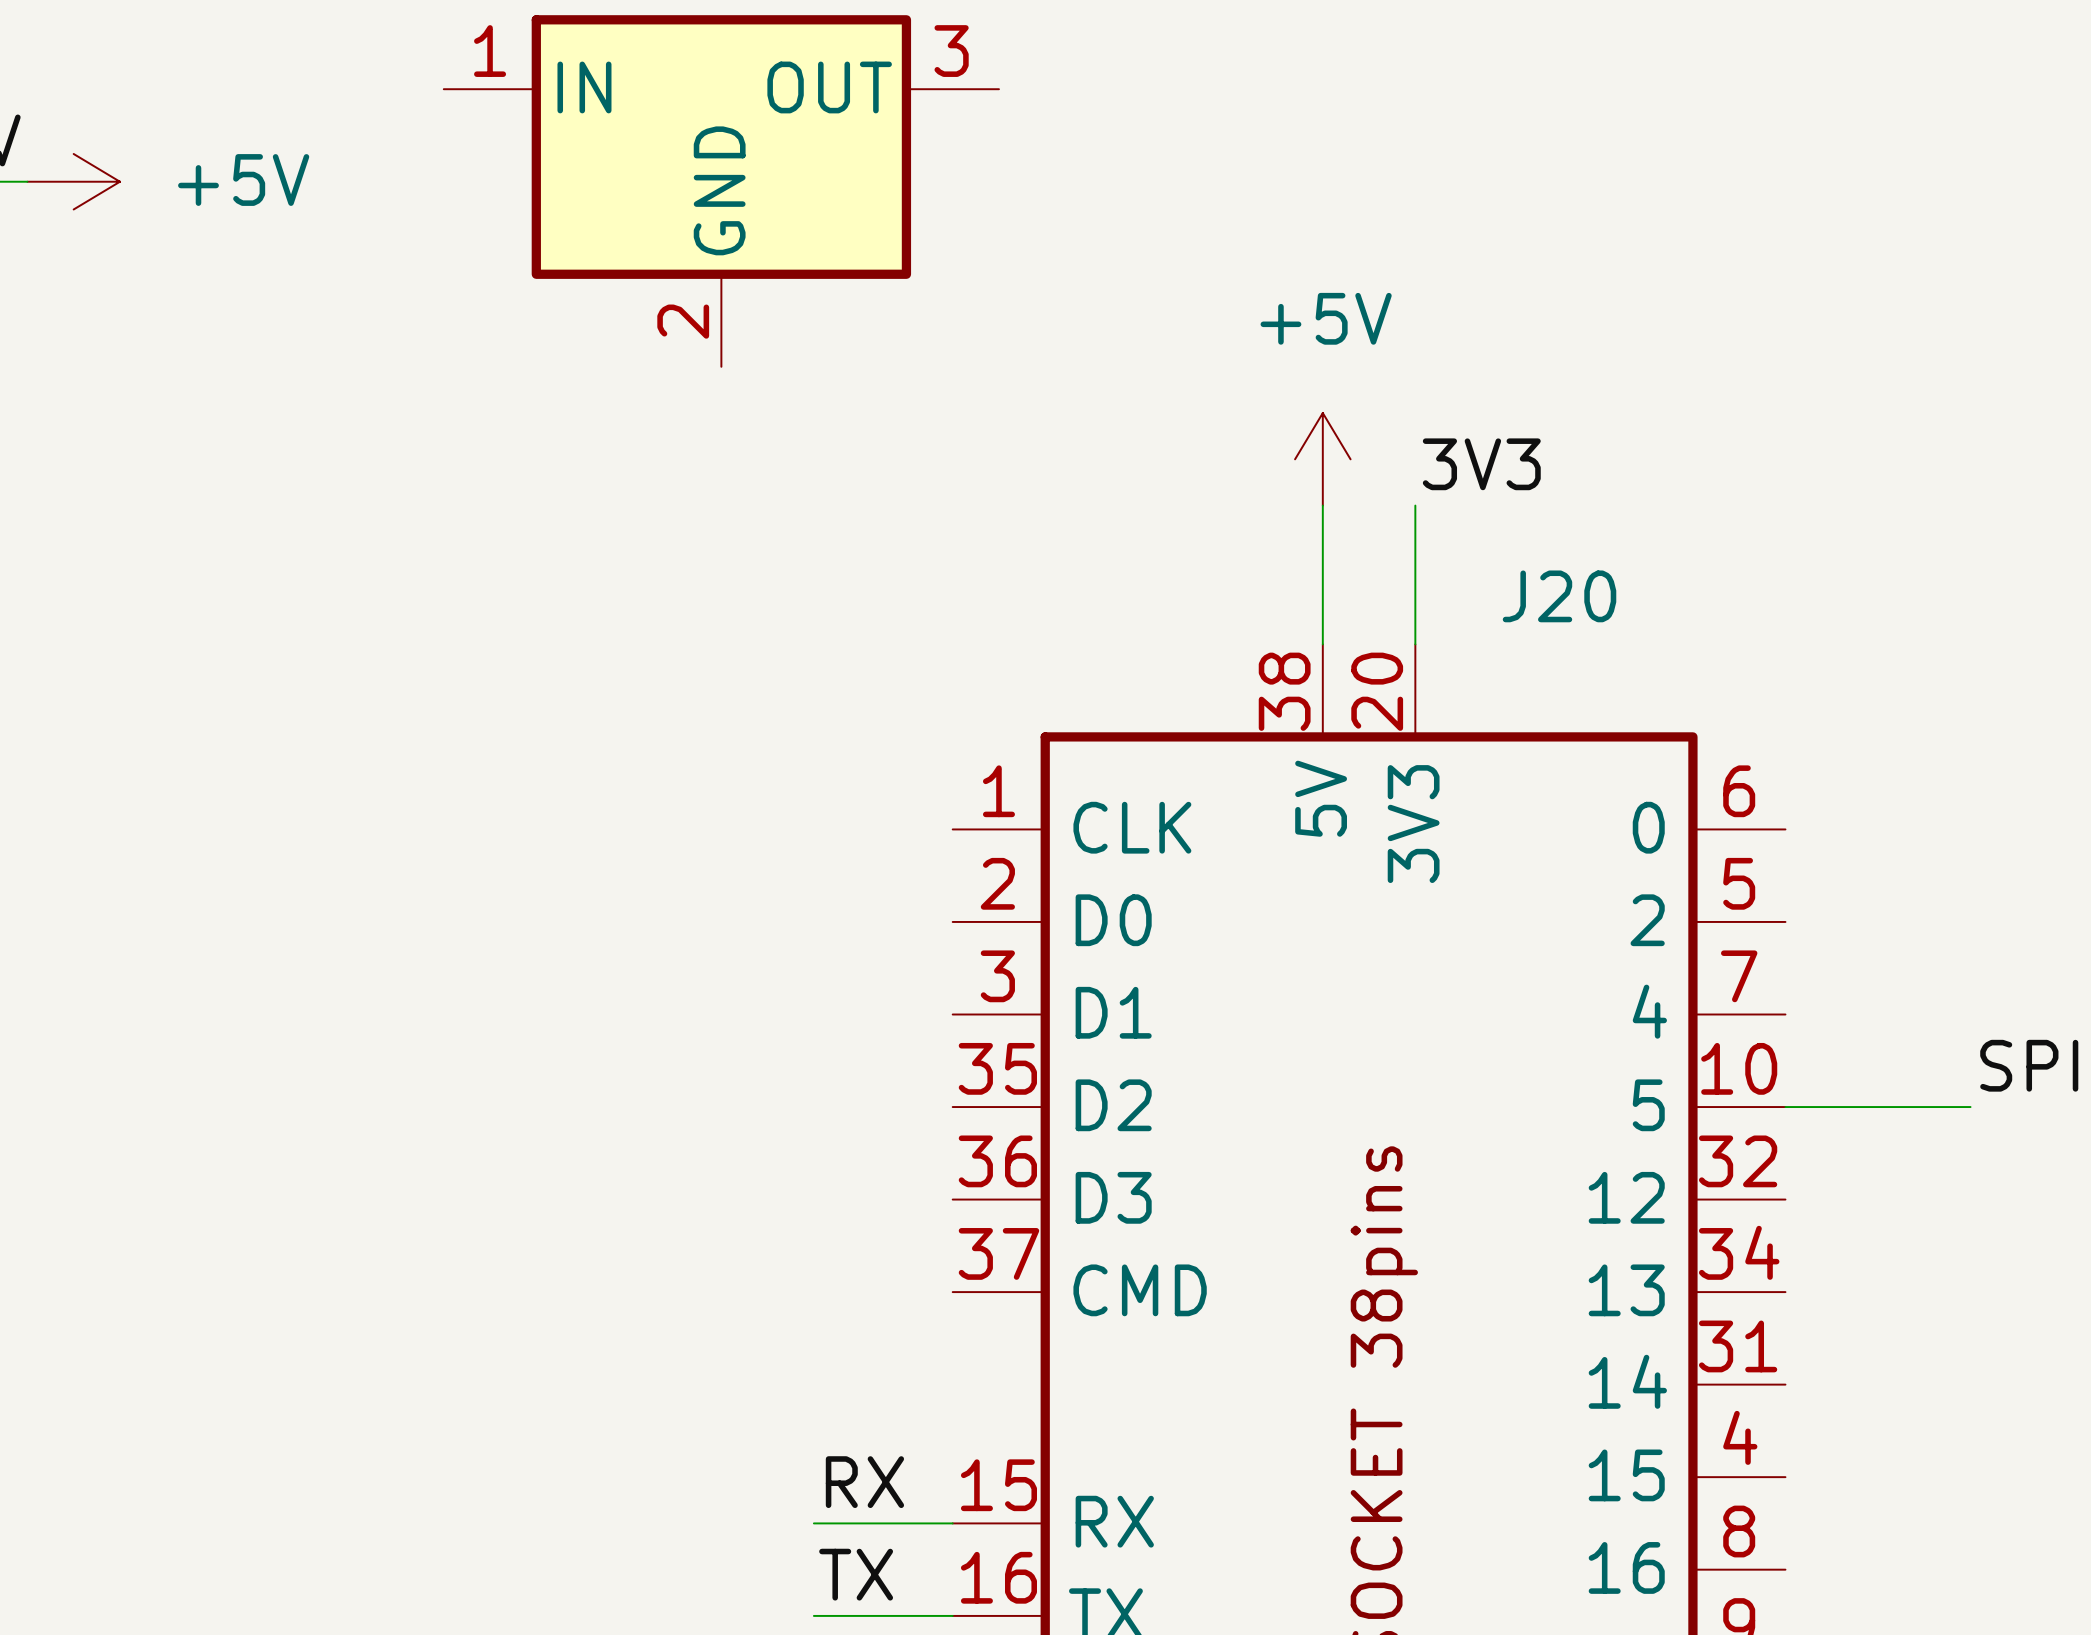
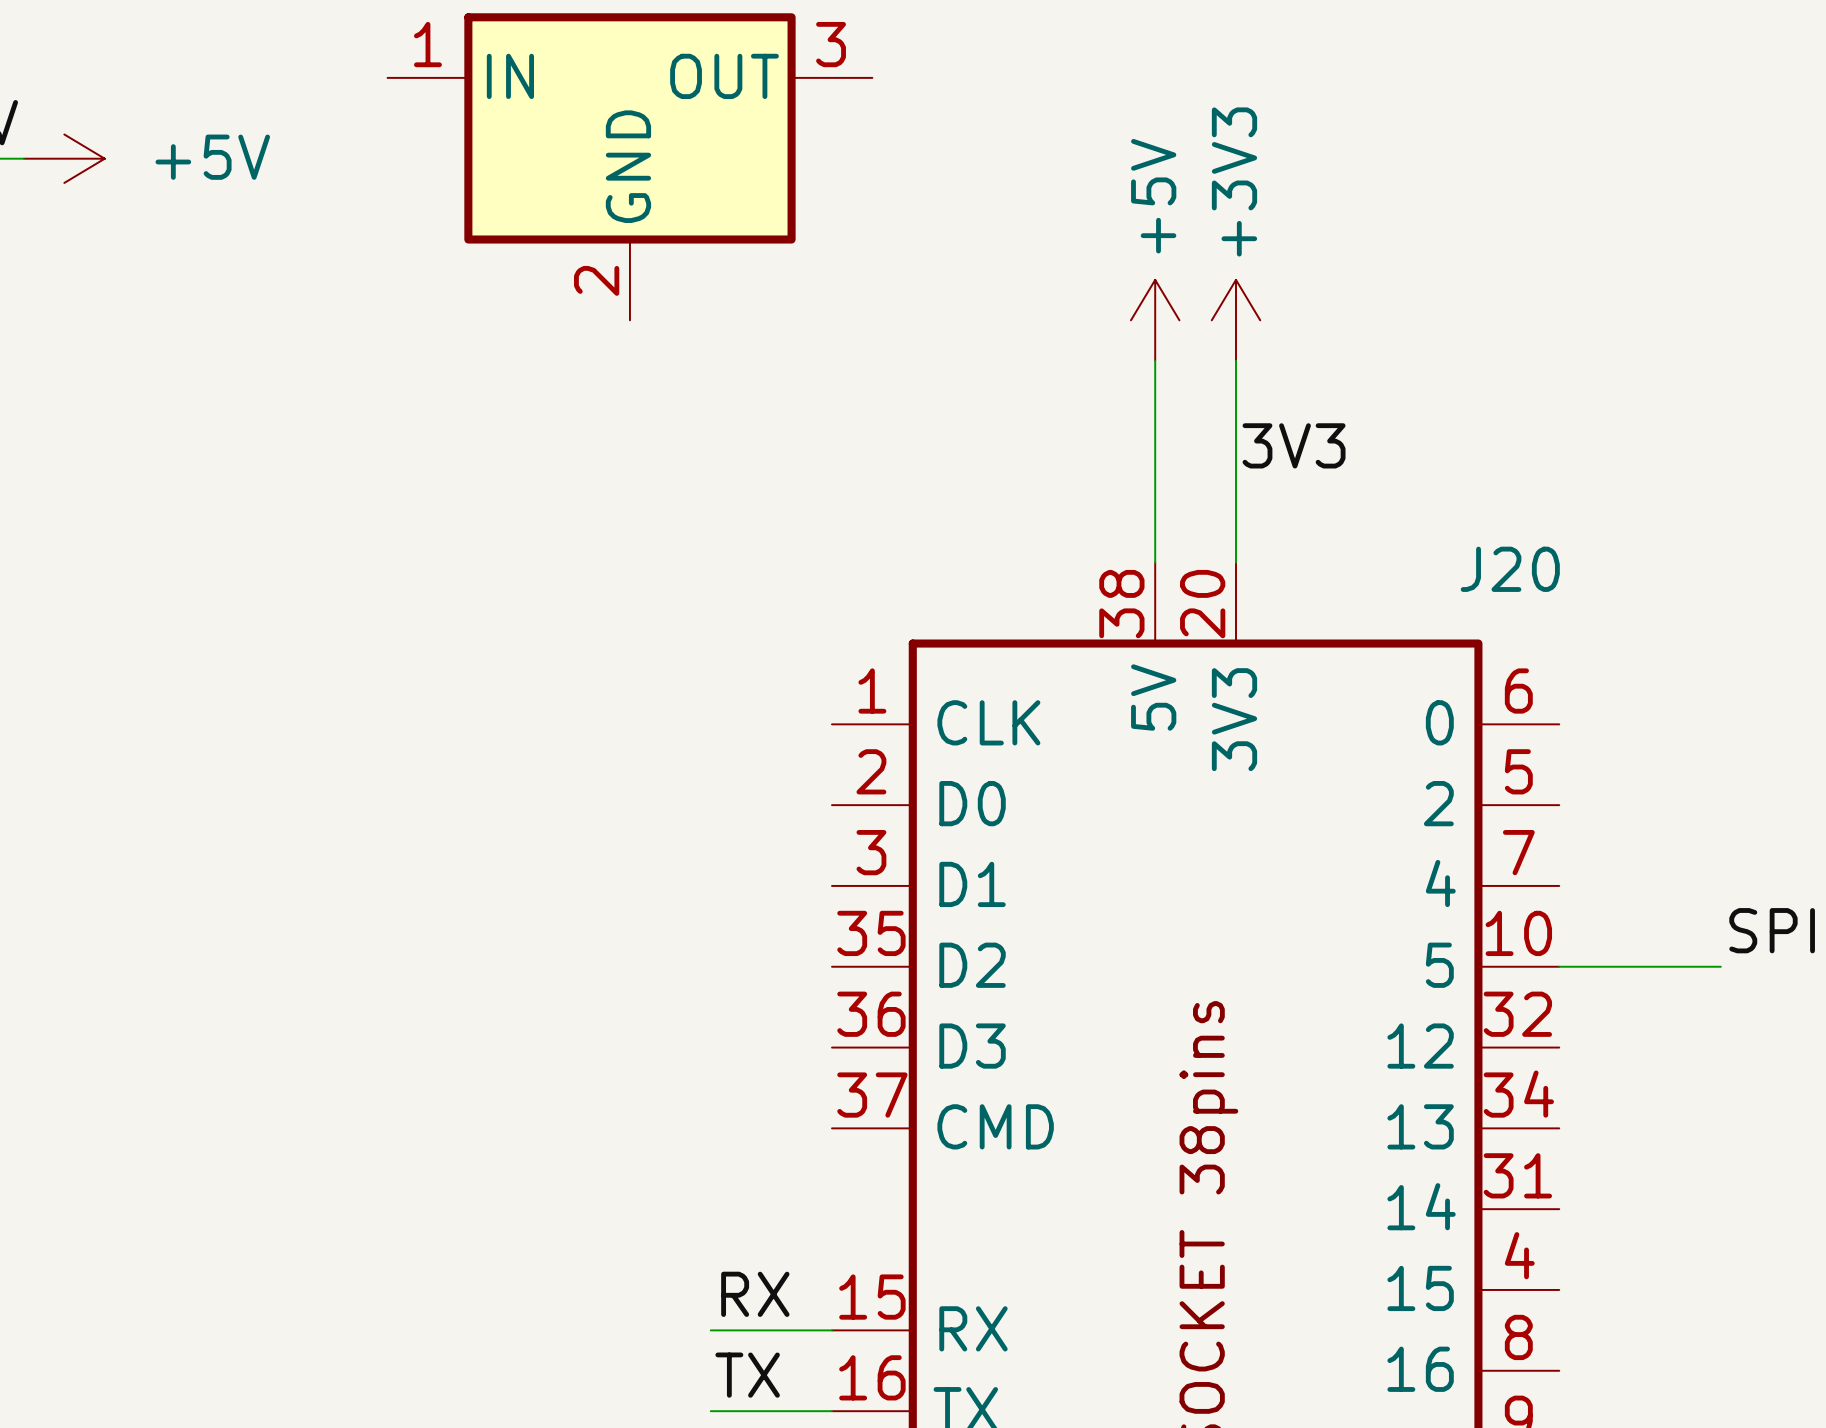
power symbol text rotation: 0° (1326, 318) -> 90° counterclockwise (1153, 196)
power symbol: none -> +3V3 (1236, 320)
wire: none -> (1236, 360) (1236, 441)
power symbol position: +5V (1322, 459) -> +5V (1155, 320)
label position: 3V3 (1481, 464) -> 3V3 (1294, 445)
J20 name position: J20 (1559, 596) -> J20 (1510, 569)

